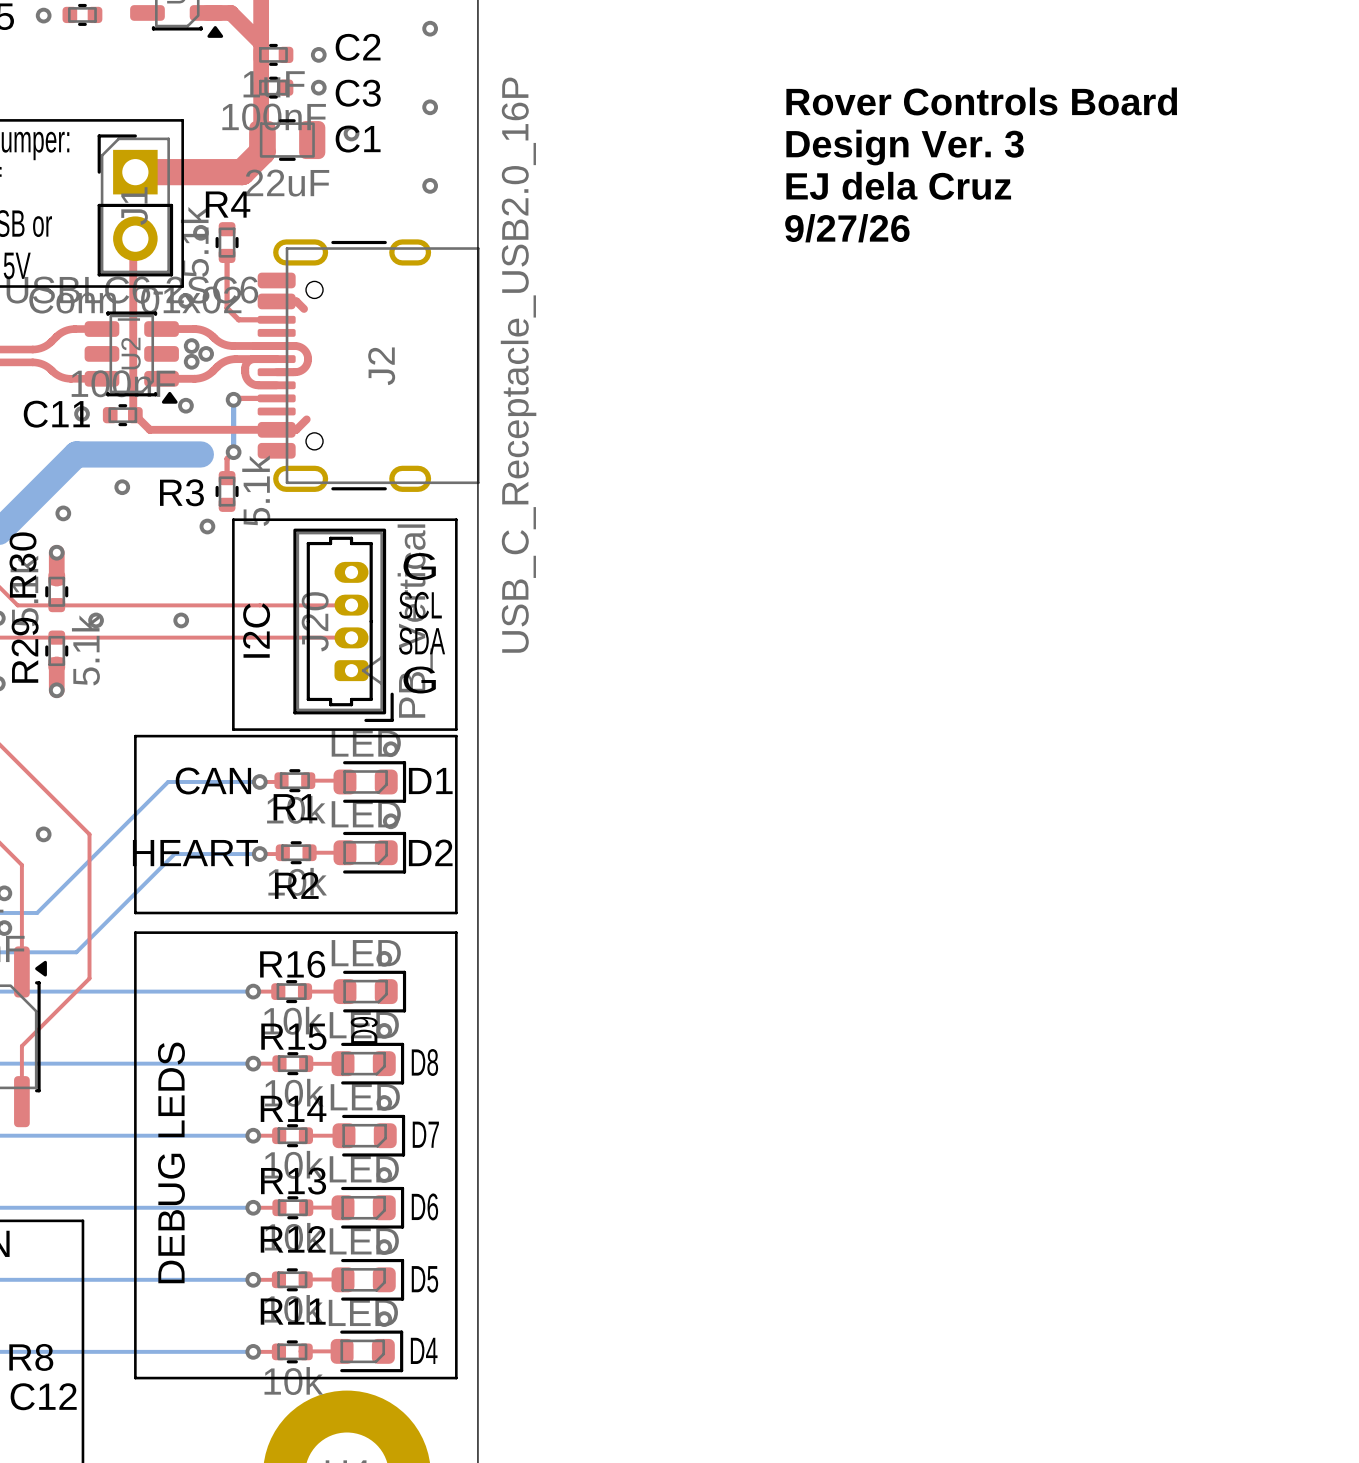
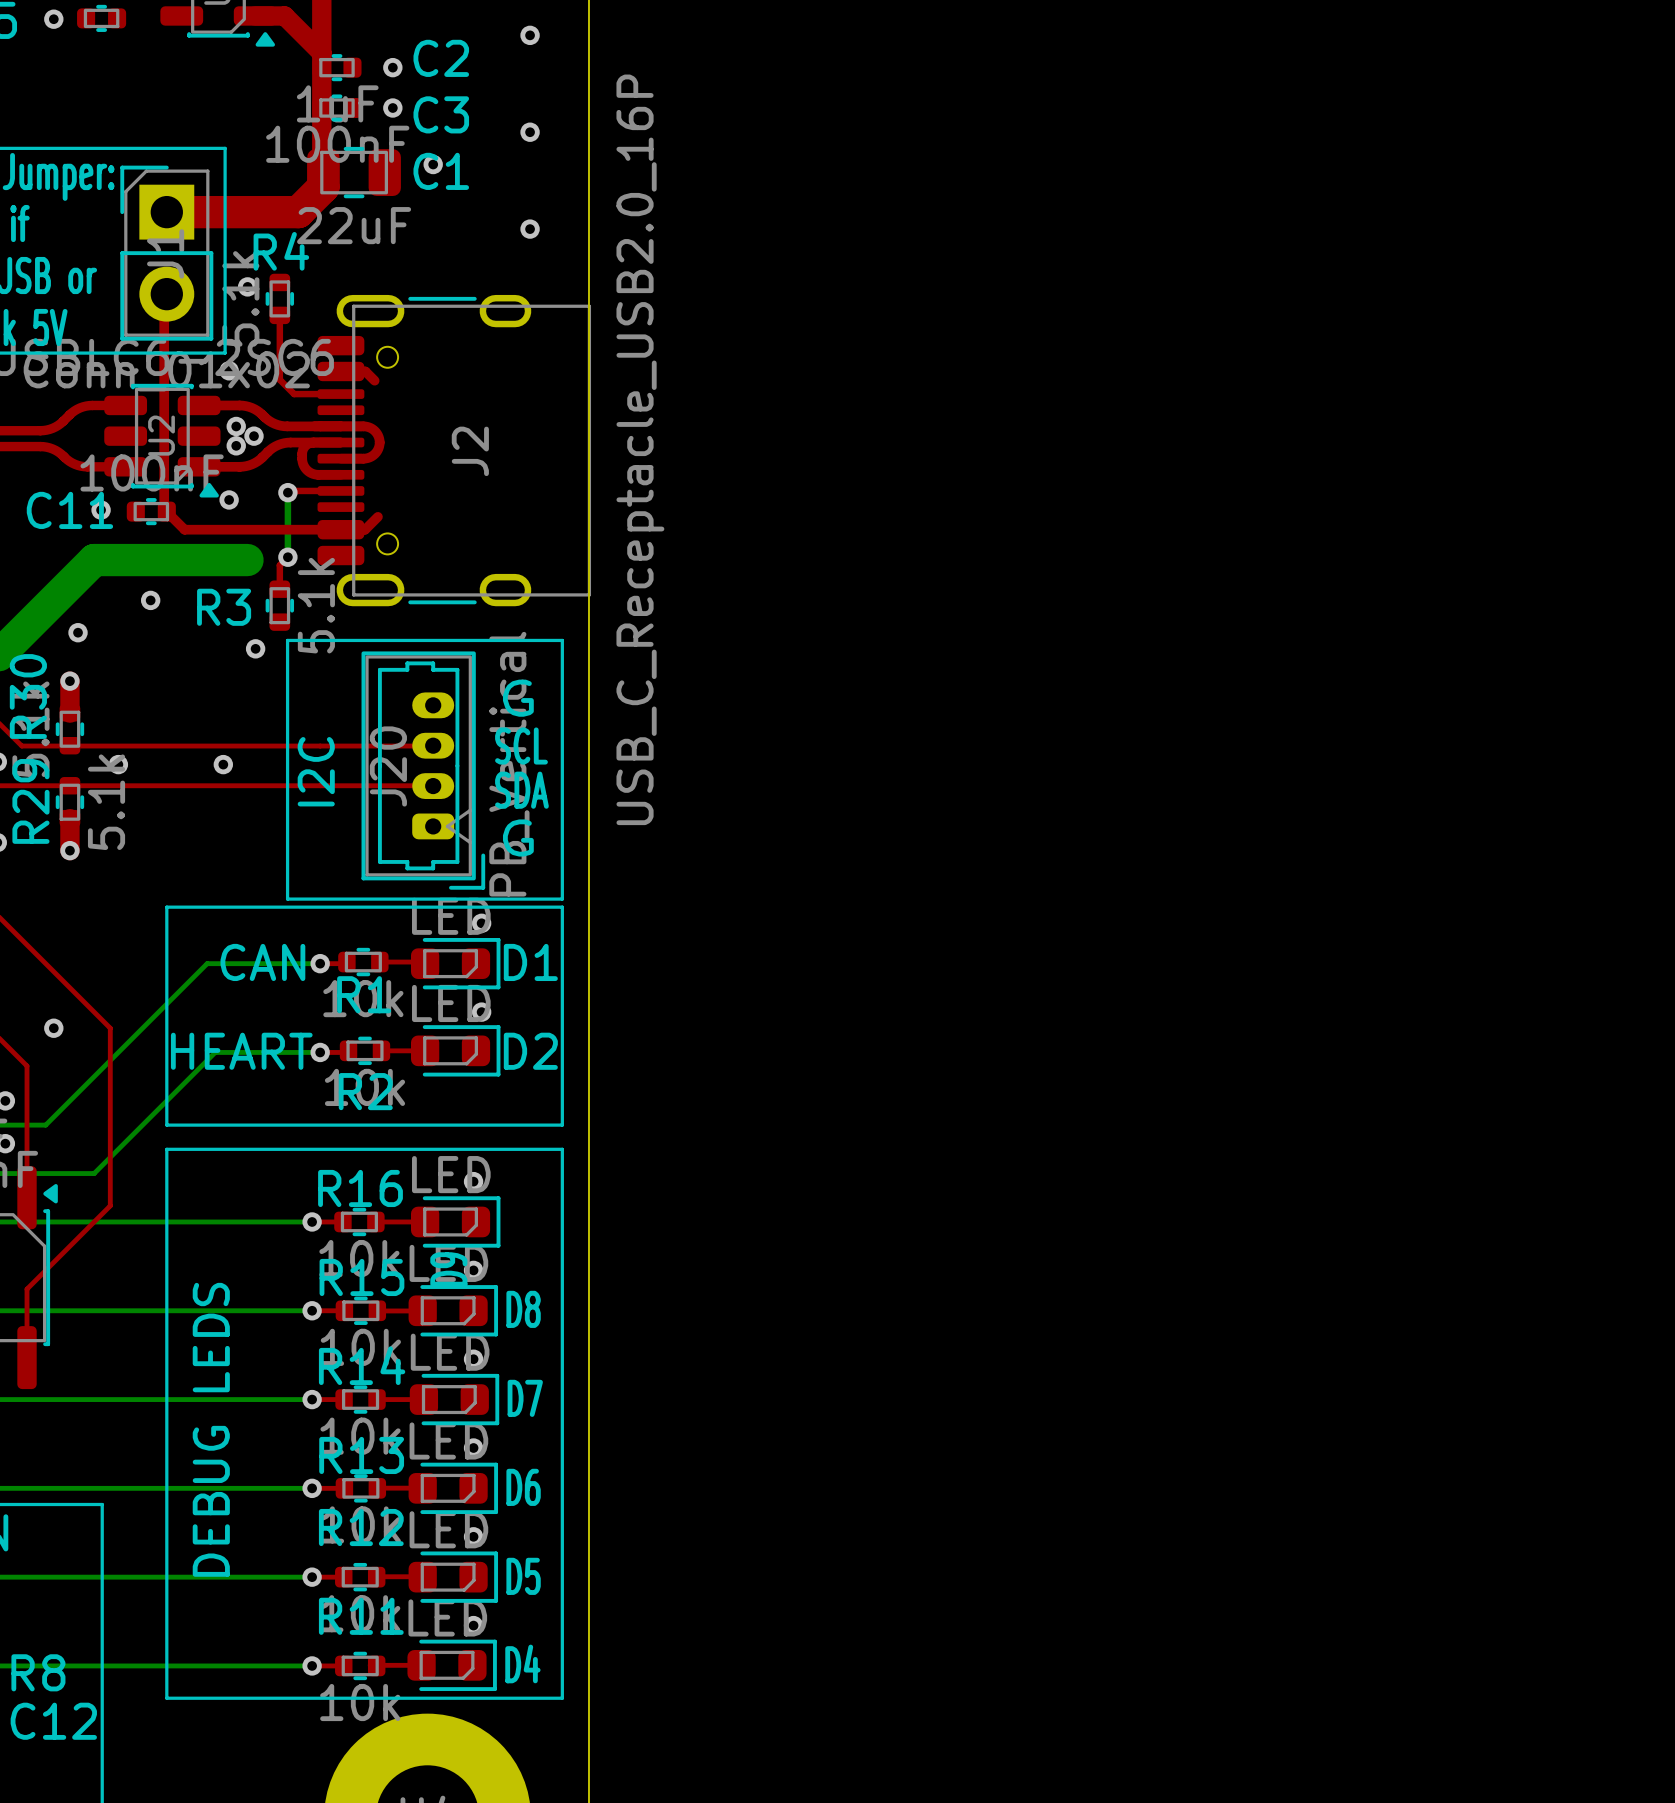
text: Rover Controls Board (981, 101) -> none
text: Design Ver. 3 (905, 147) -> none
text: EJ dela Cruz (898, 185) -> none
text: 9/27/26 (847, 228) -> none

